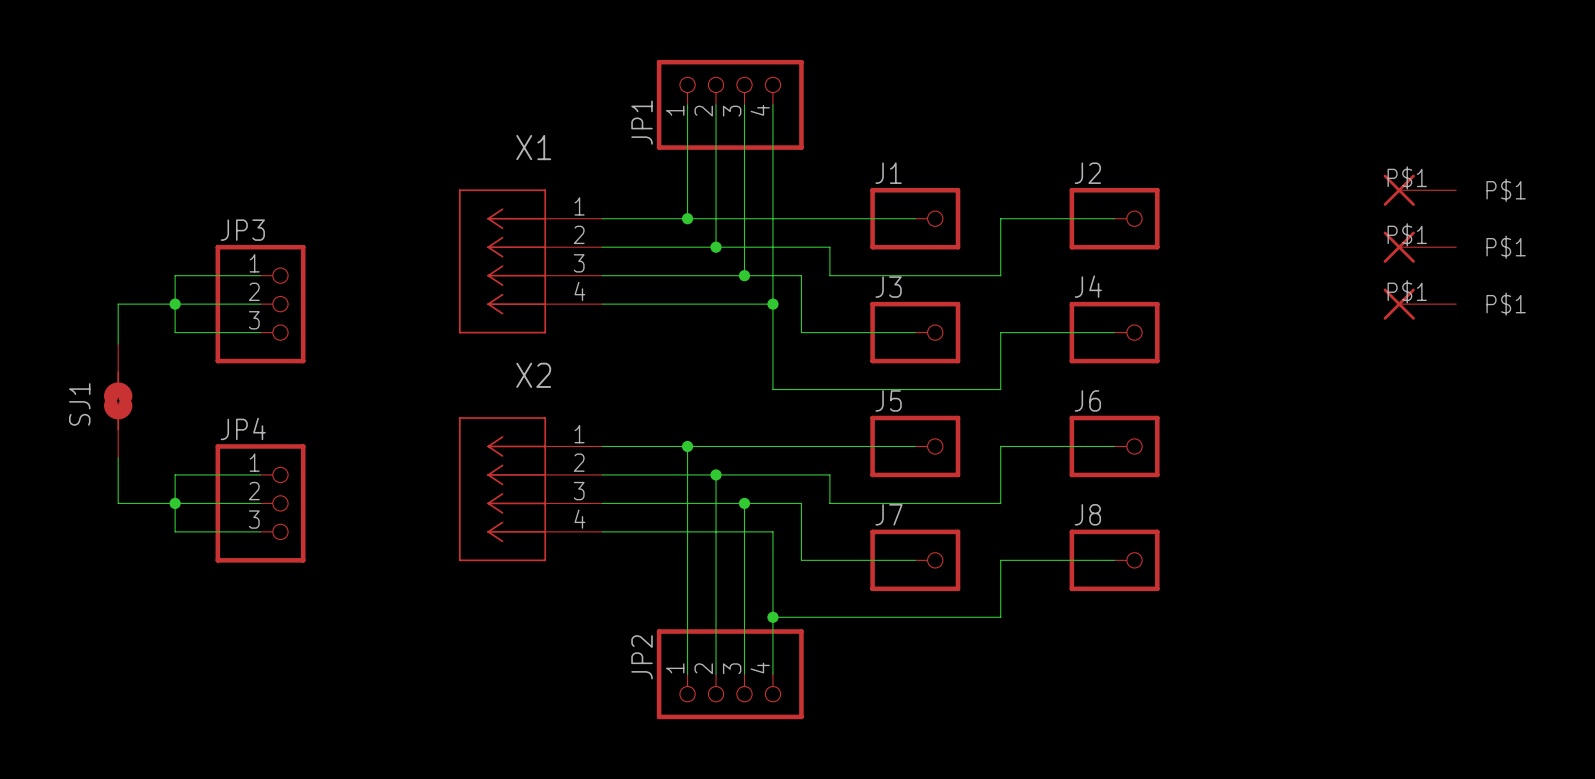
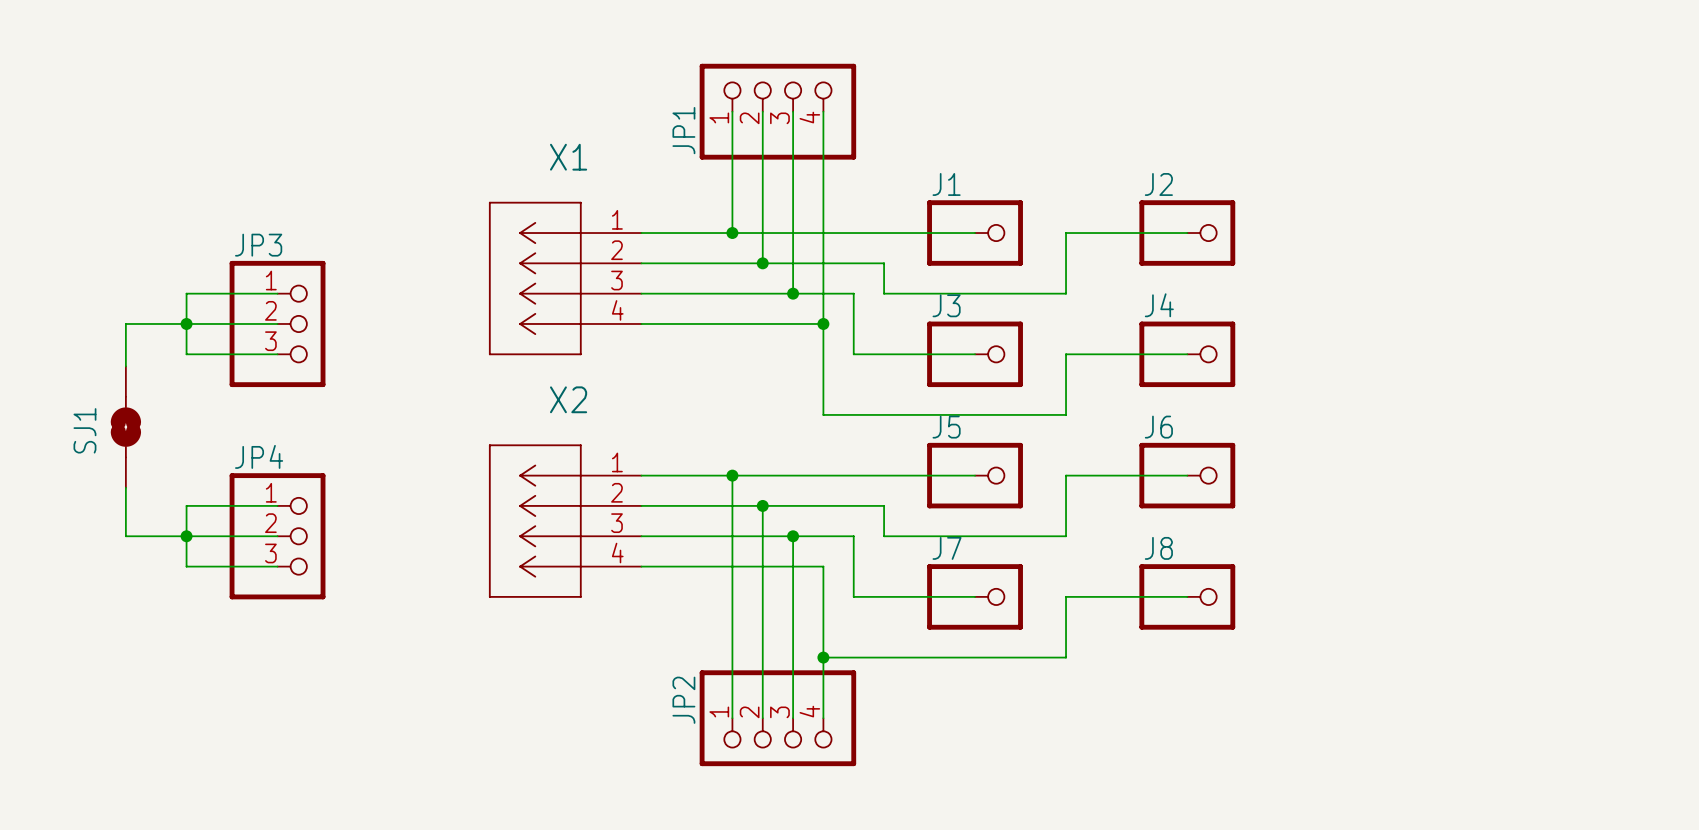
part: (1419, 190) -> none
part: (1419, 247) -> none
part: (1419, 304) -> none

